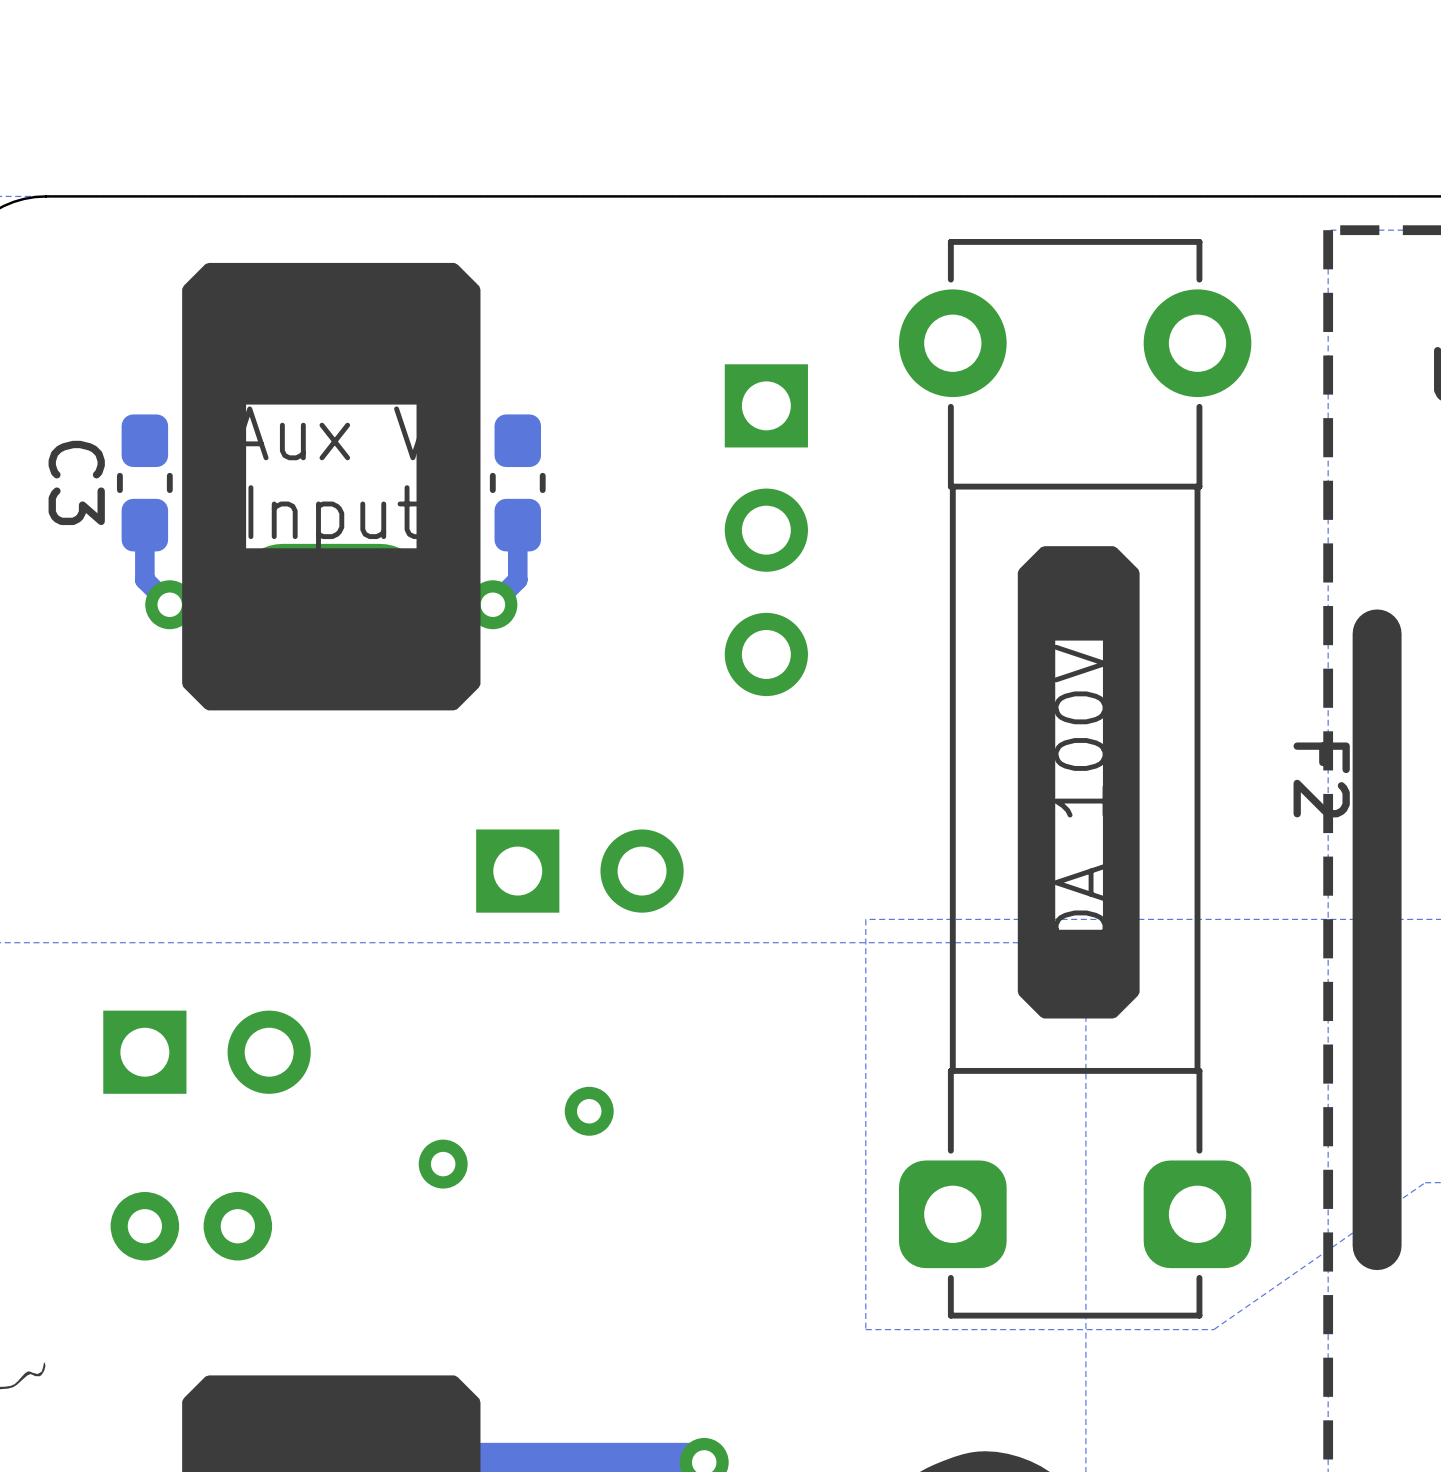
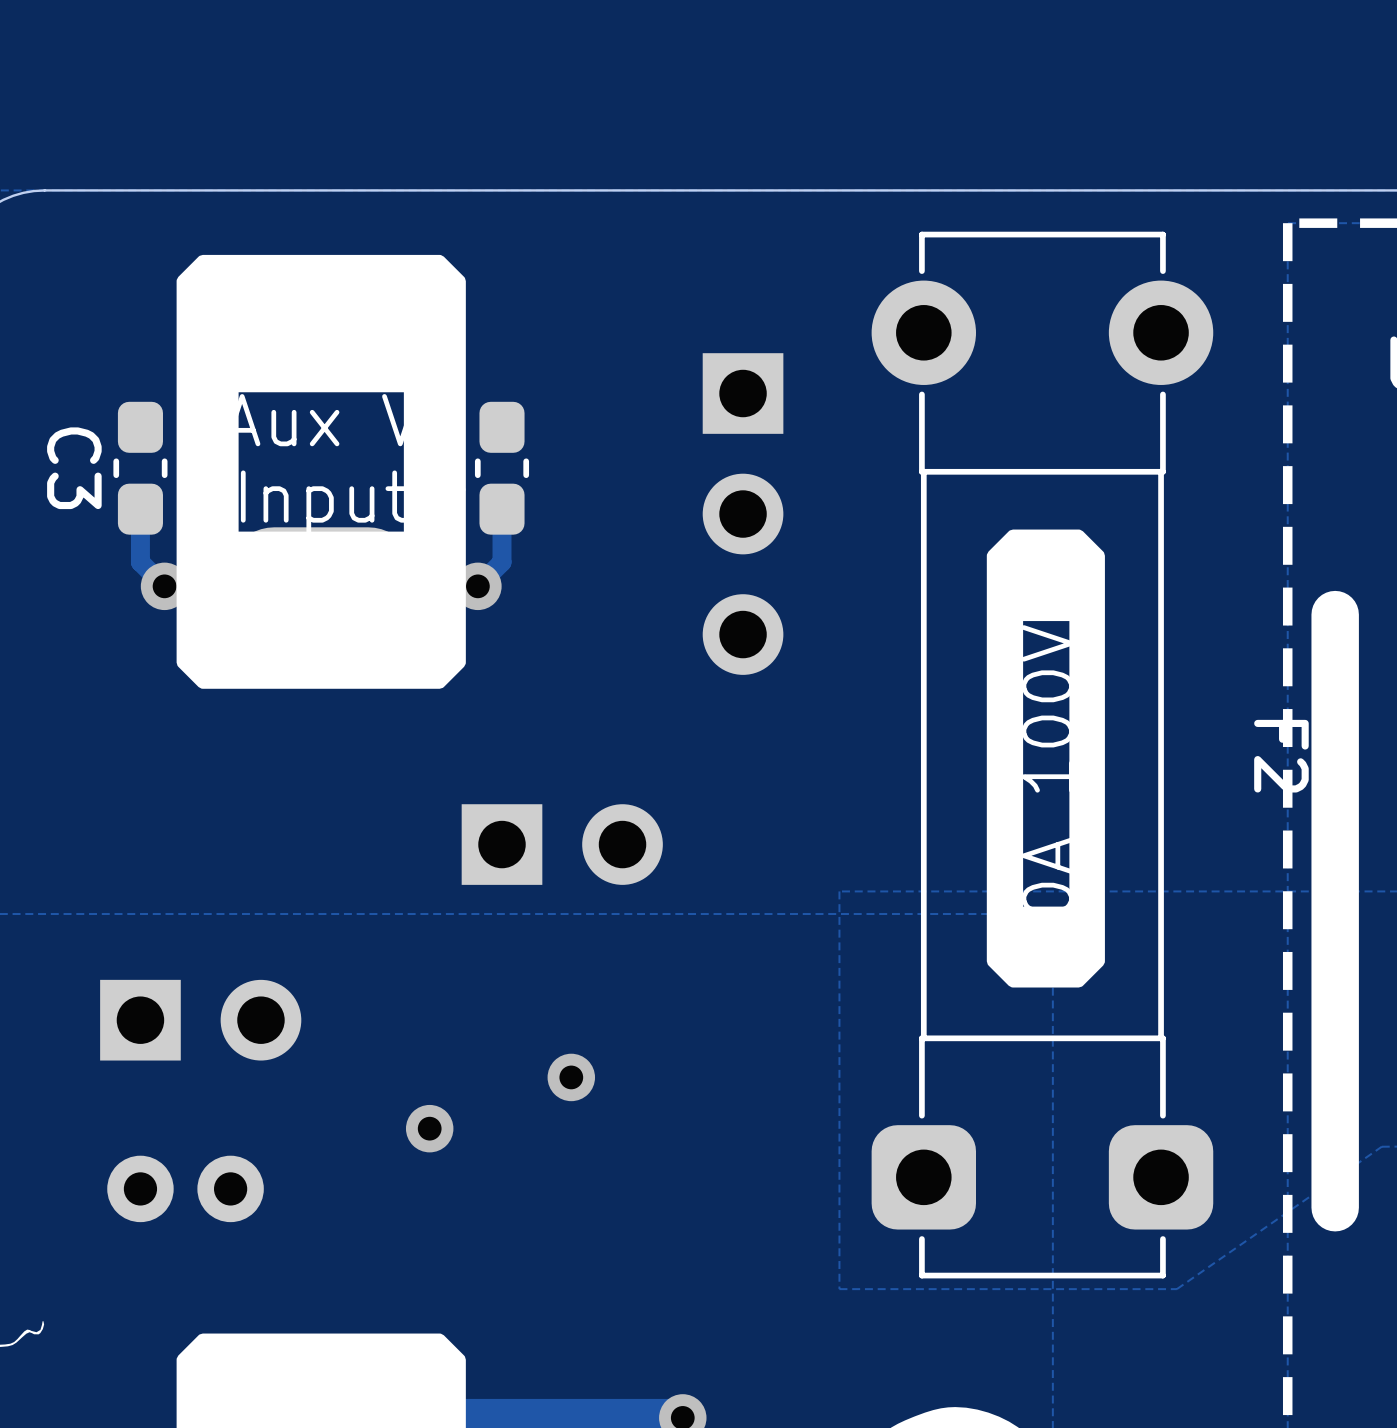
drawing shape: [1017, 546, 1140, 1019] -> [986, 529, 1105, 988]

